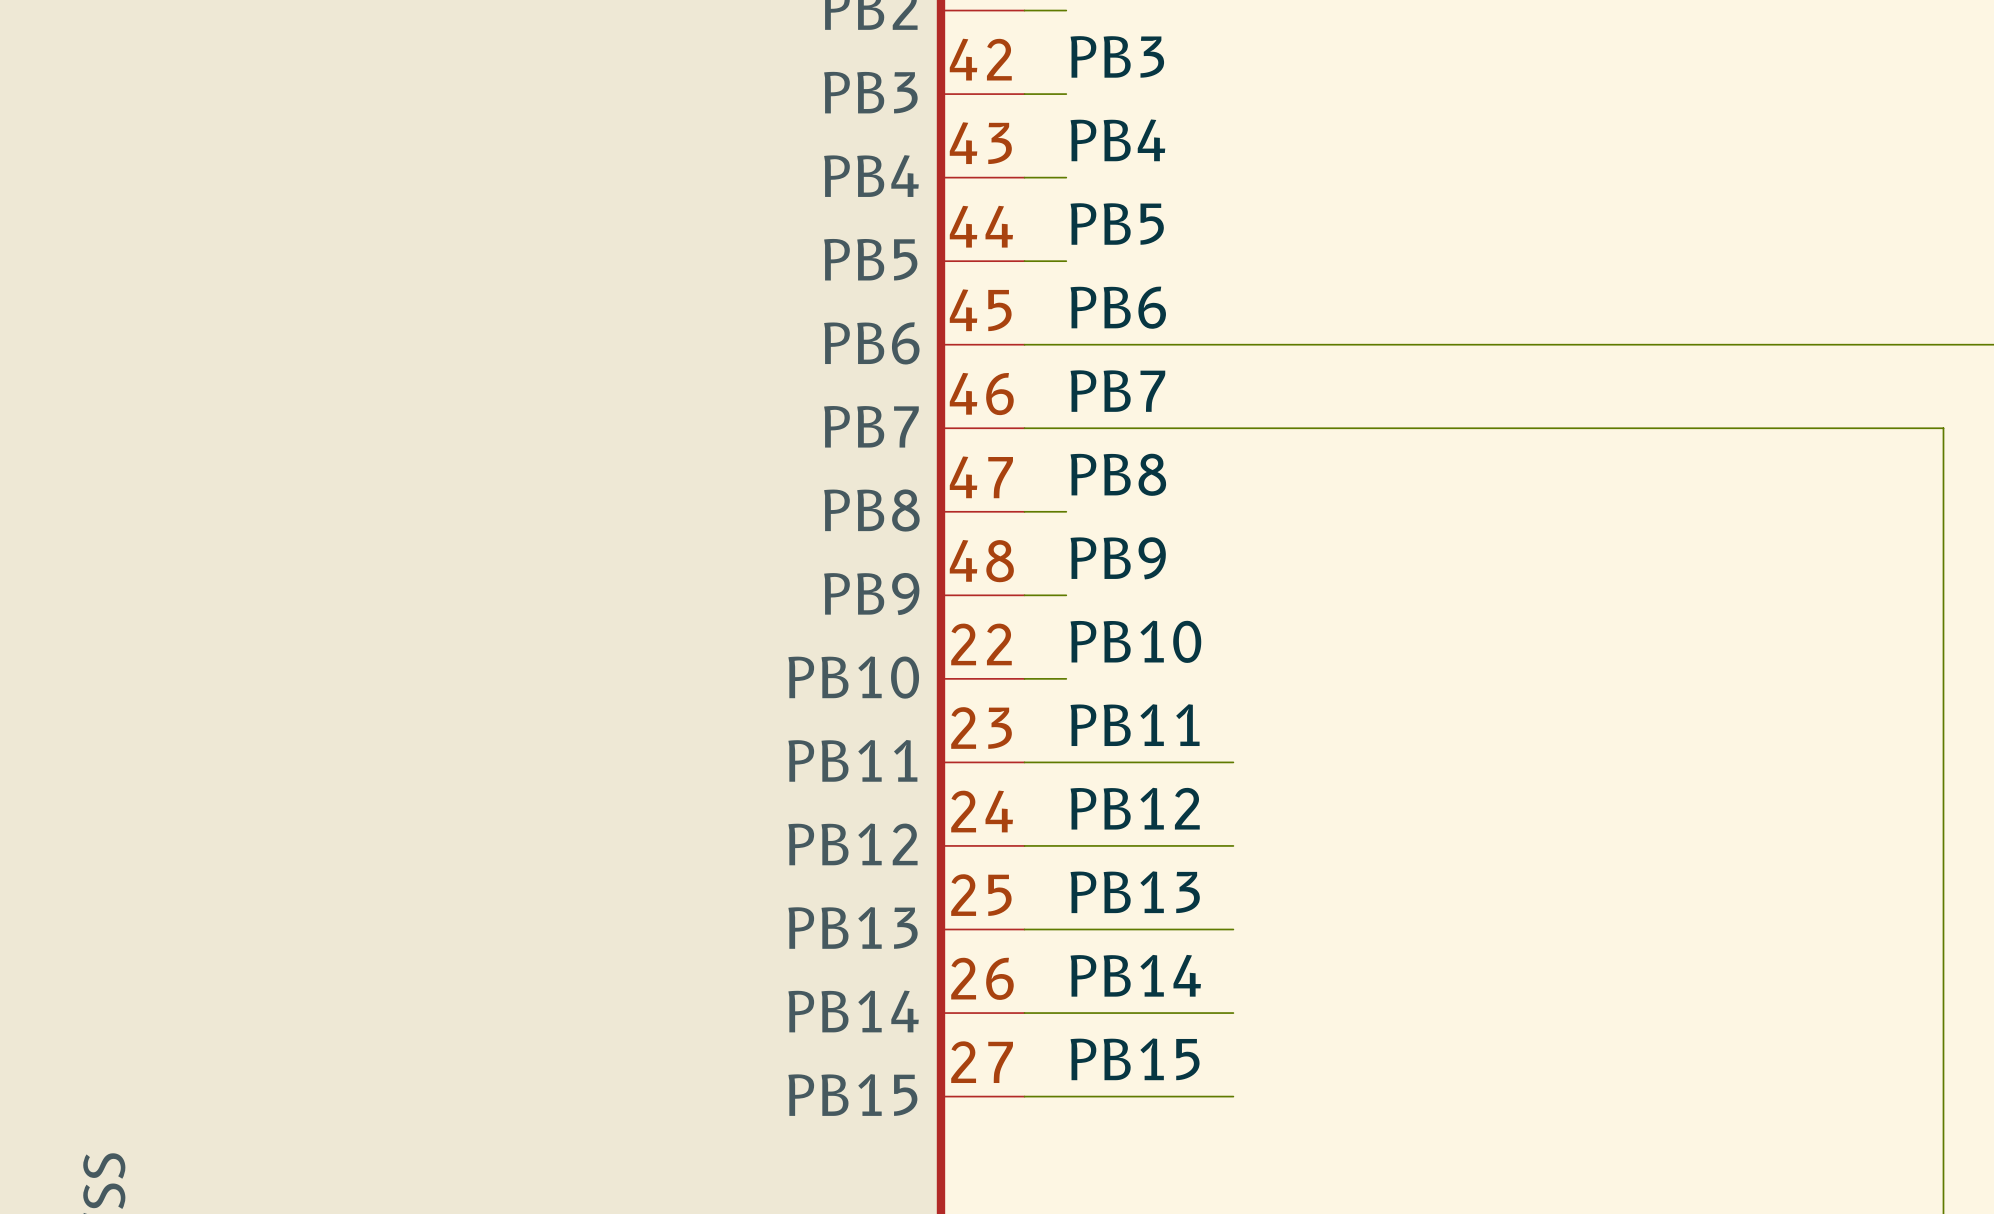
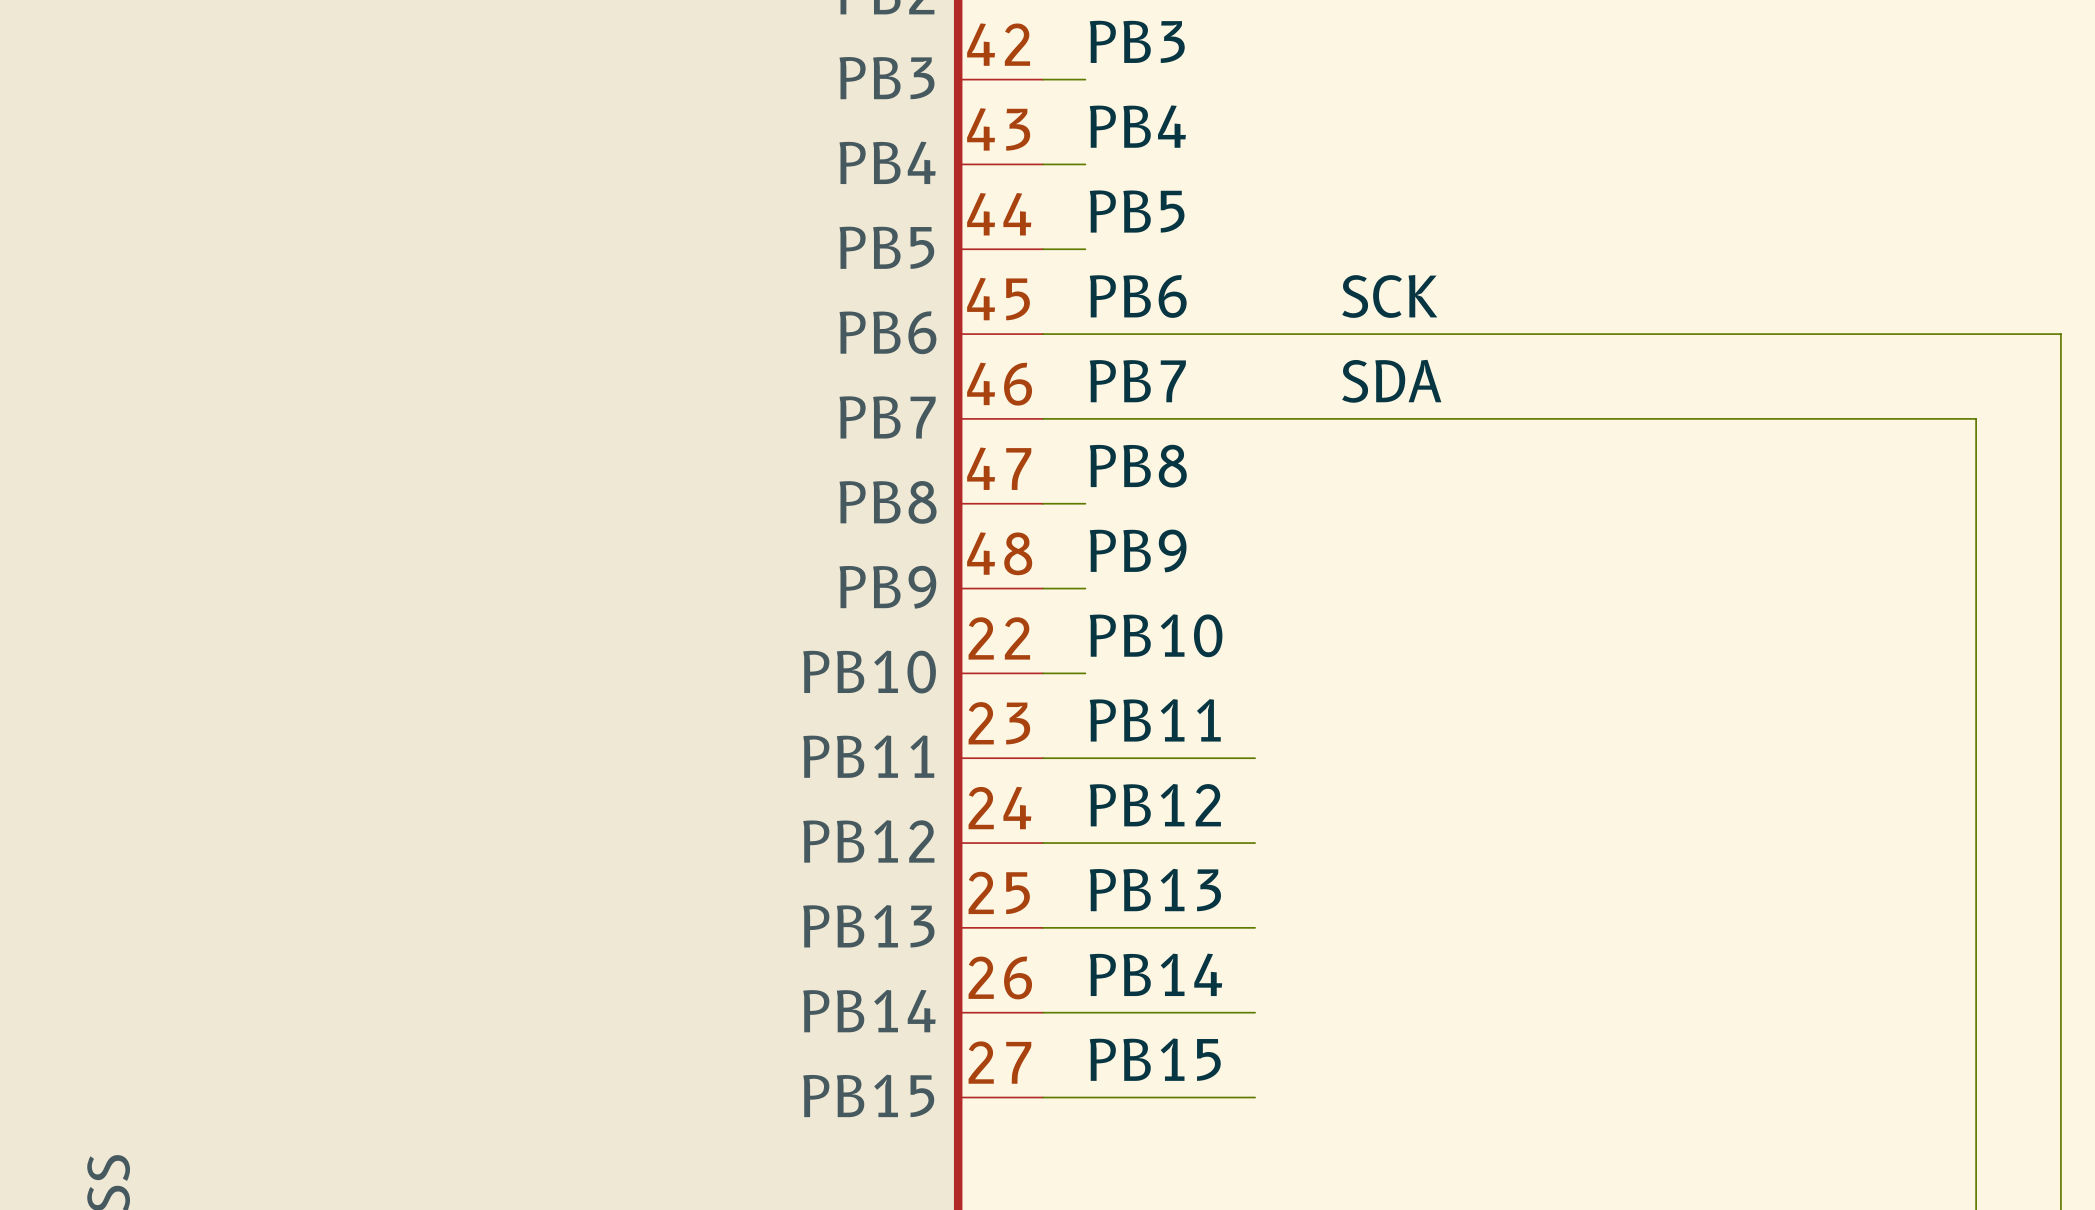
label: none -> SCK (1389, 296)
label: none -> SDA (1391, 381)

